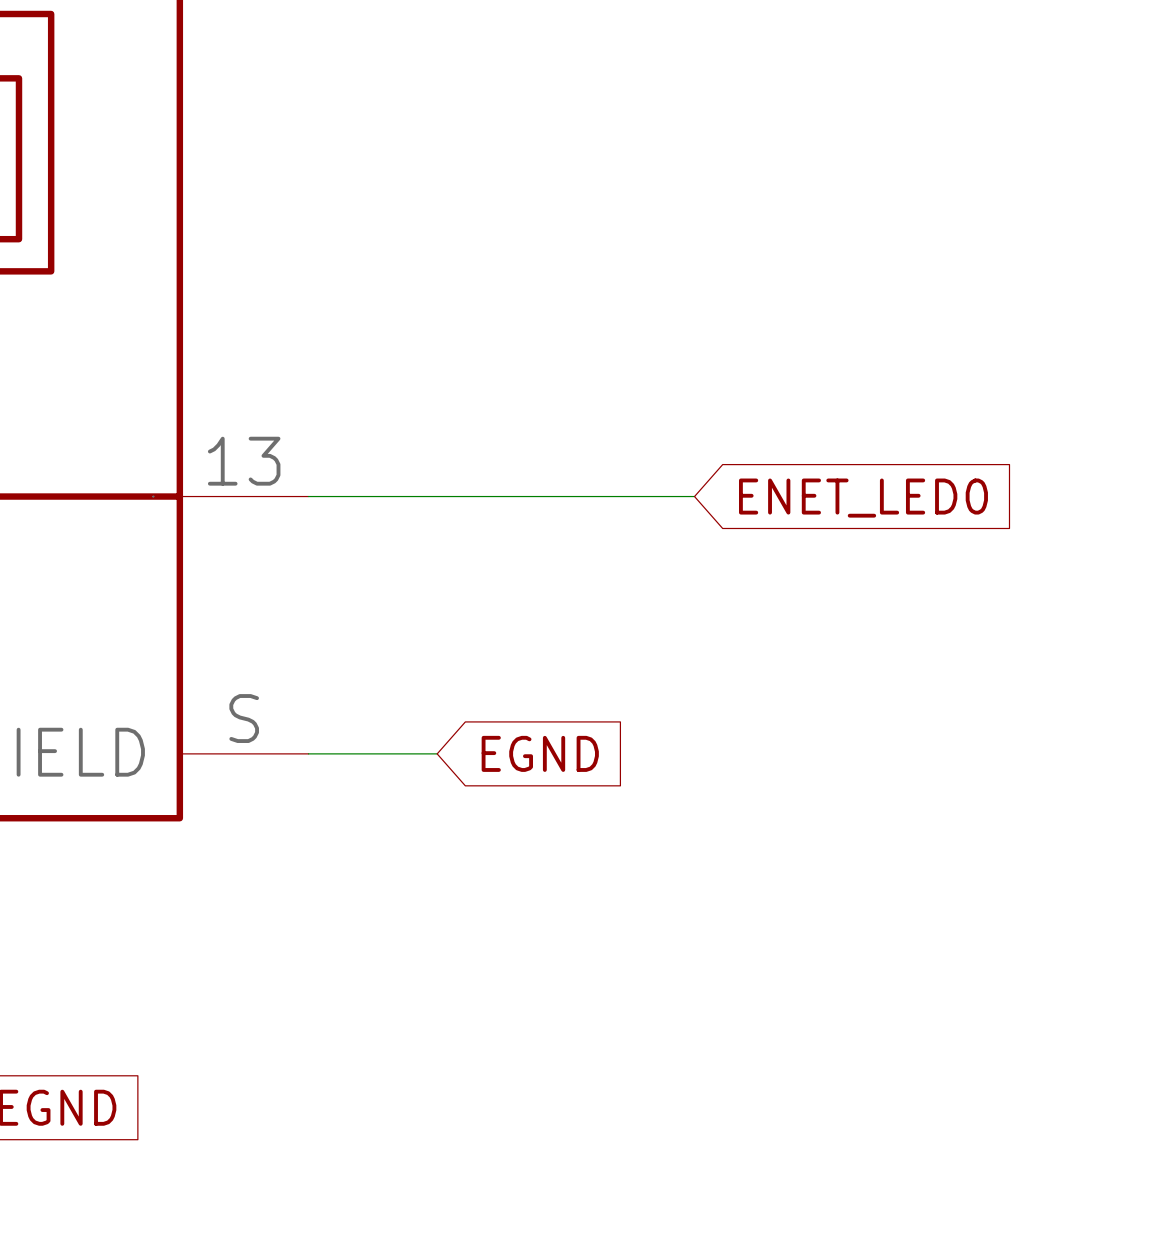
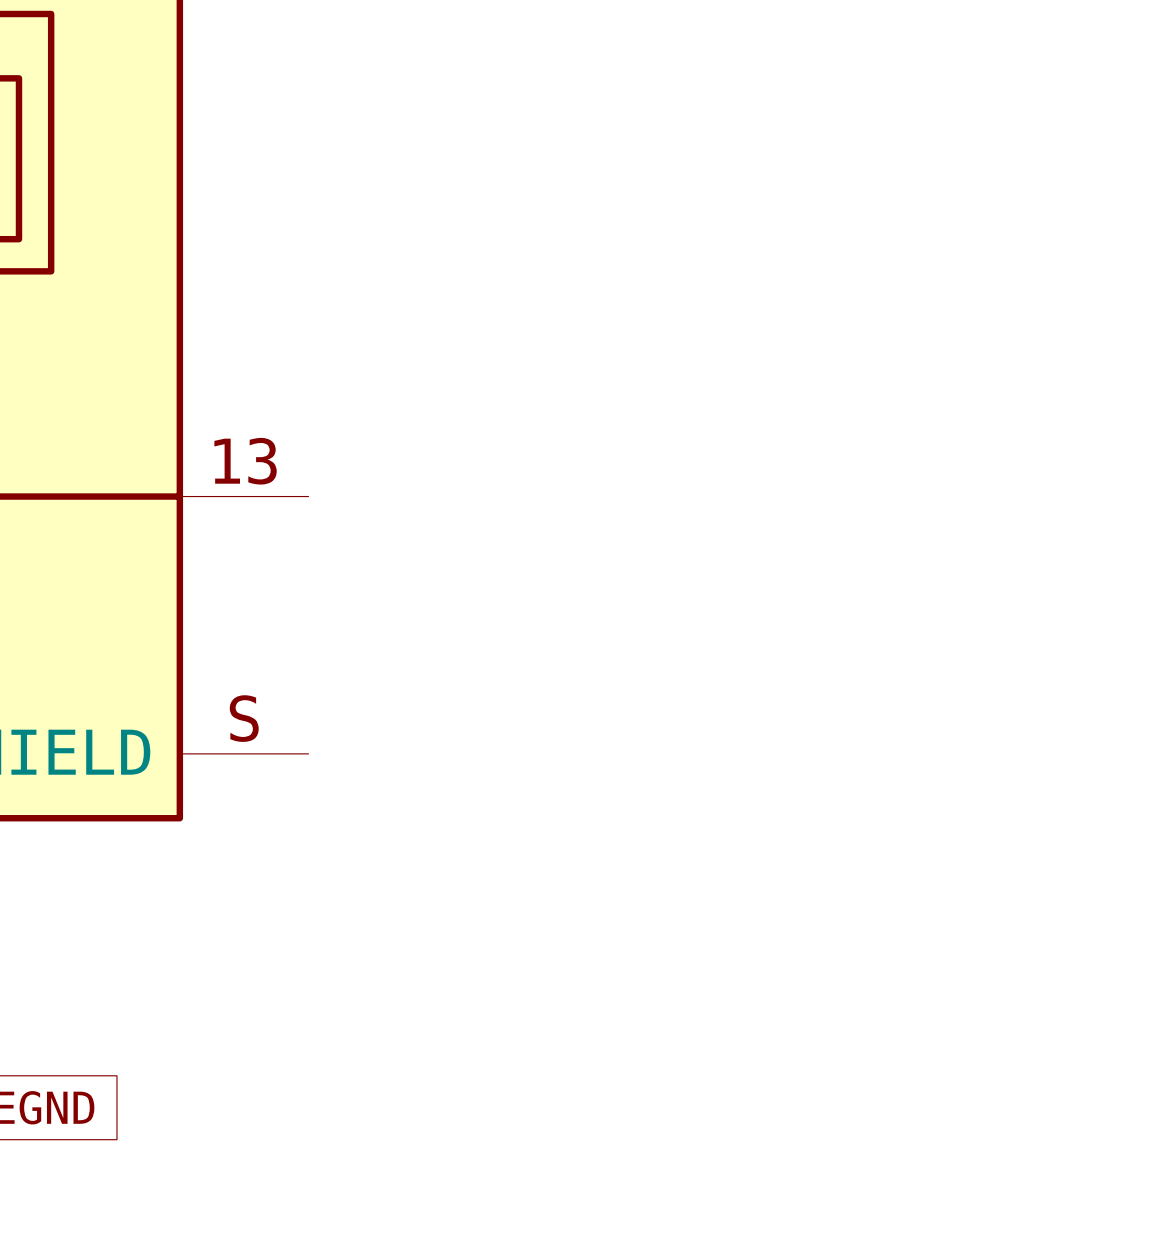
wire: (308, 496) (694, 496) -> none
global label: ENET_LED0 (863, 498) -> none
wire: (308, 753) (437, 753) -> none
global label: EGND (540, 753) -> none

